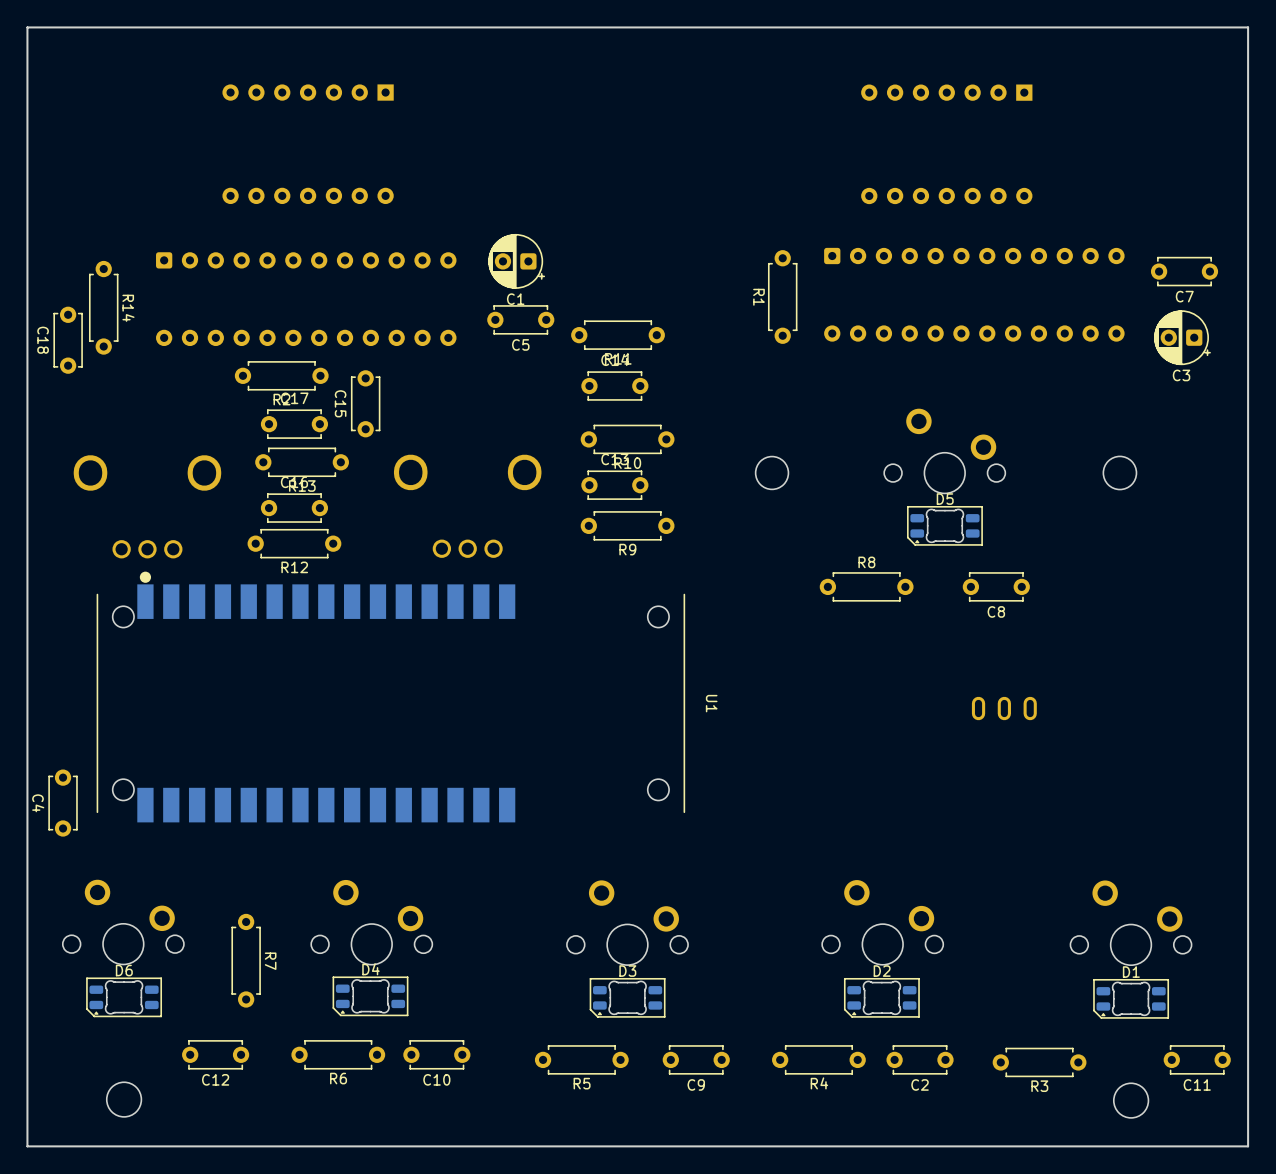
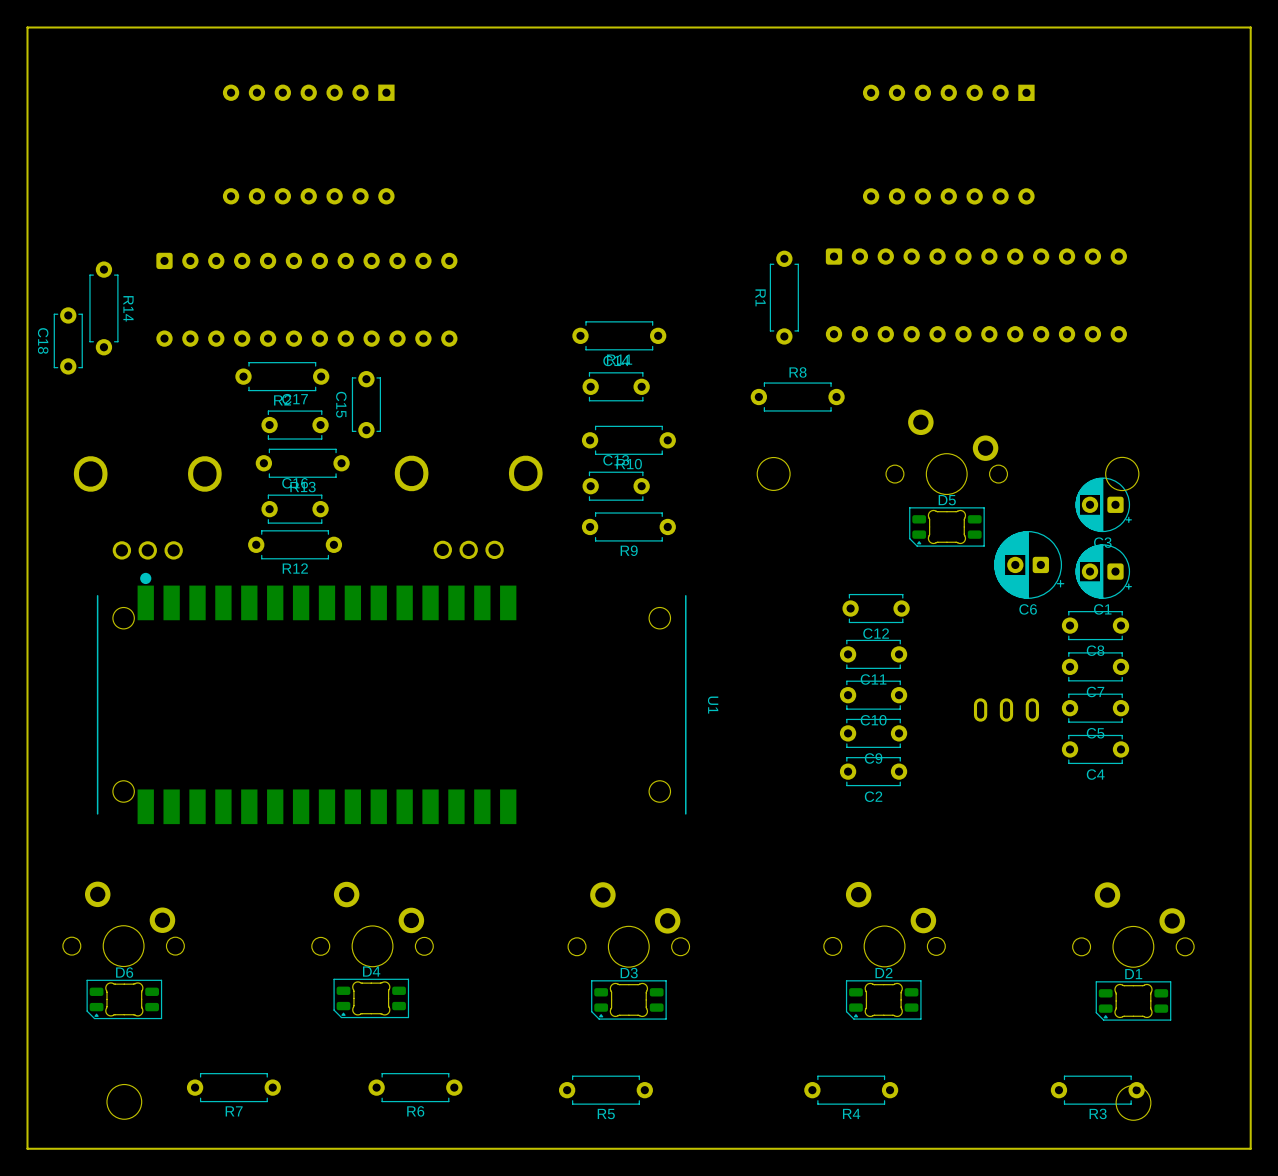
C1 position: (516, 261) -> (1103, 571)
C7 position: (1184, 271) -> (1095, 666)
C5 position: (520, 319) -> (1095, 708)
C3 position: (1182, 337) -> (1103, 504)
C6: none -> (1029, 564)
R8 position: (866, 586) -> (797, 397)
C8 position: (996, 586) -> (1095, 625)
C4 name position: C4 (38, 803) -> C4 (1095, 774)
C4 rotation: 0° (63, 803) -> 90° clockwise (1095, 749)
C4 position: (63, 803) -> (1095, 749)
R7 rotation: 0° (246, 960) -> 90° clockwise (233, 1087)
R7 position: (246, 960) -> (233, 1087)
C12 position: (215, 1054) -> (876, 608)
R6 position: (338, 1054) -> (415, 1087)
C10 position: (436, 1054) -> (873, 695)
R5 position: (581, 1059) -> (605, 1090)
C9 position: (696, 1059) -> (873, 733)
R4 position: (818, 1059) -> (851, 1090)
C2 position: (920, 1059) -> (873, 771)
C11 position: (1197, 1059) -> (873, 654)
R3 position: (1039, 1062) -> (1097, 1090)

